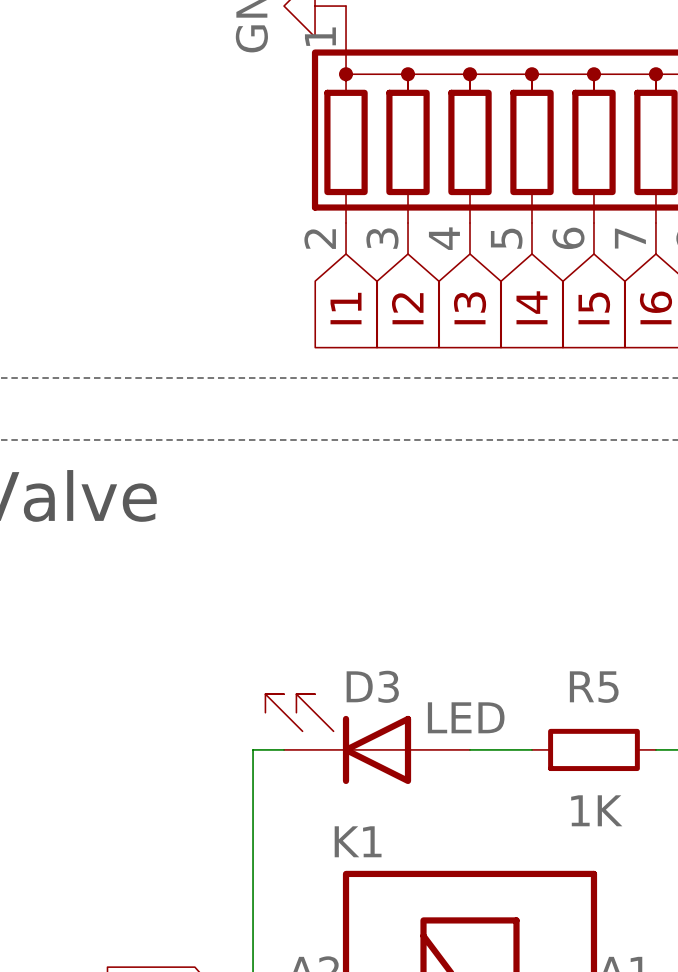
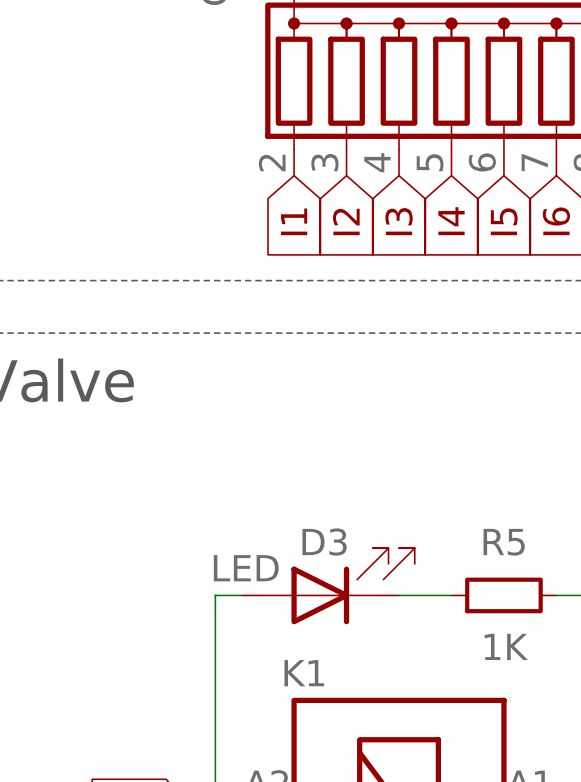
D3 flip: as is (338, 739) -> left-right (353, 586)

